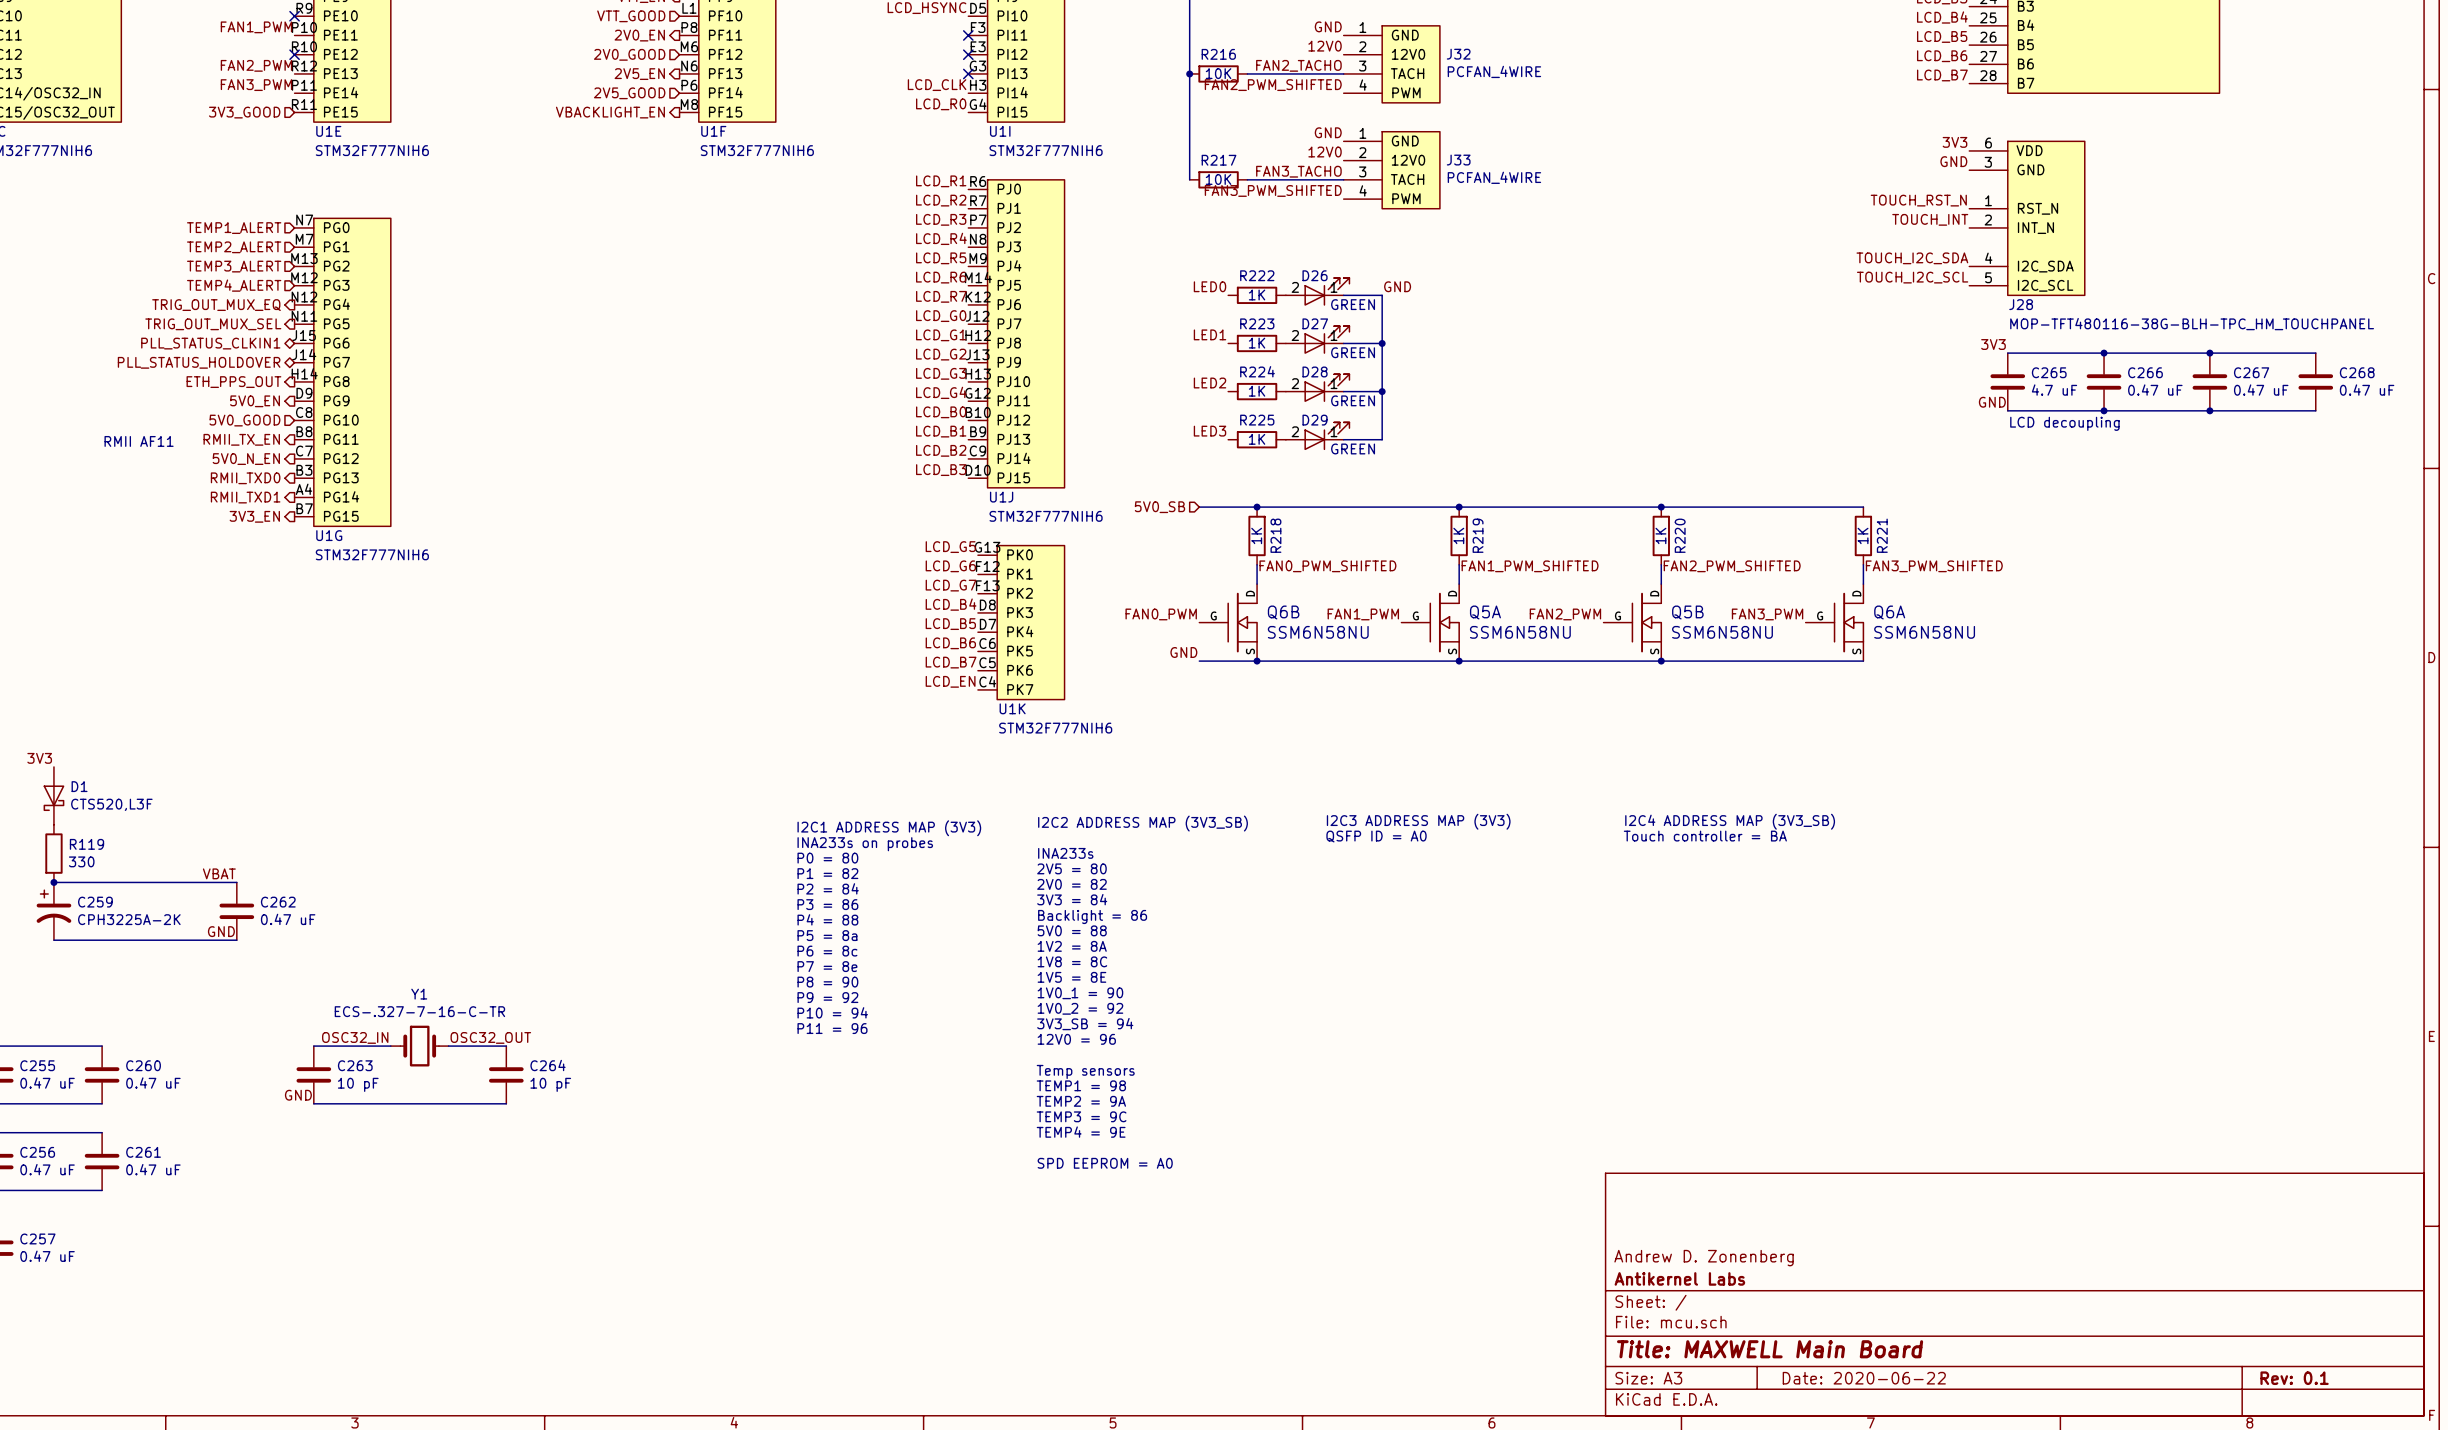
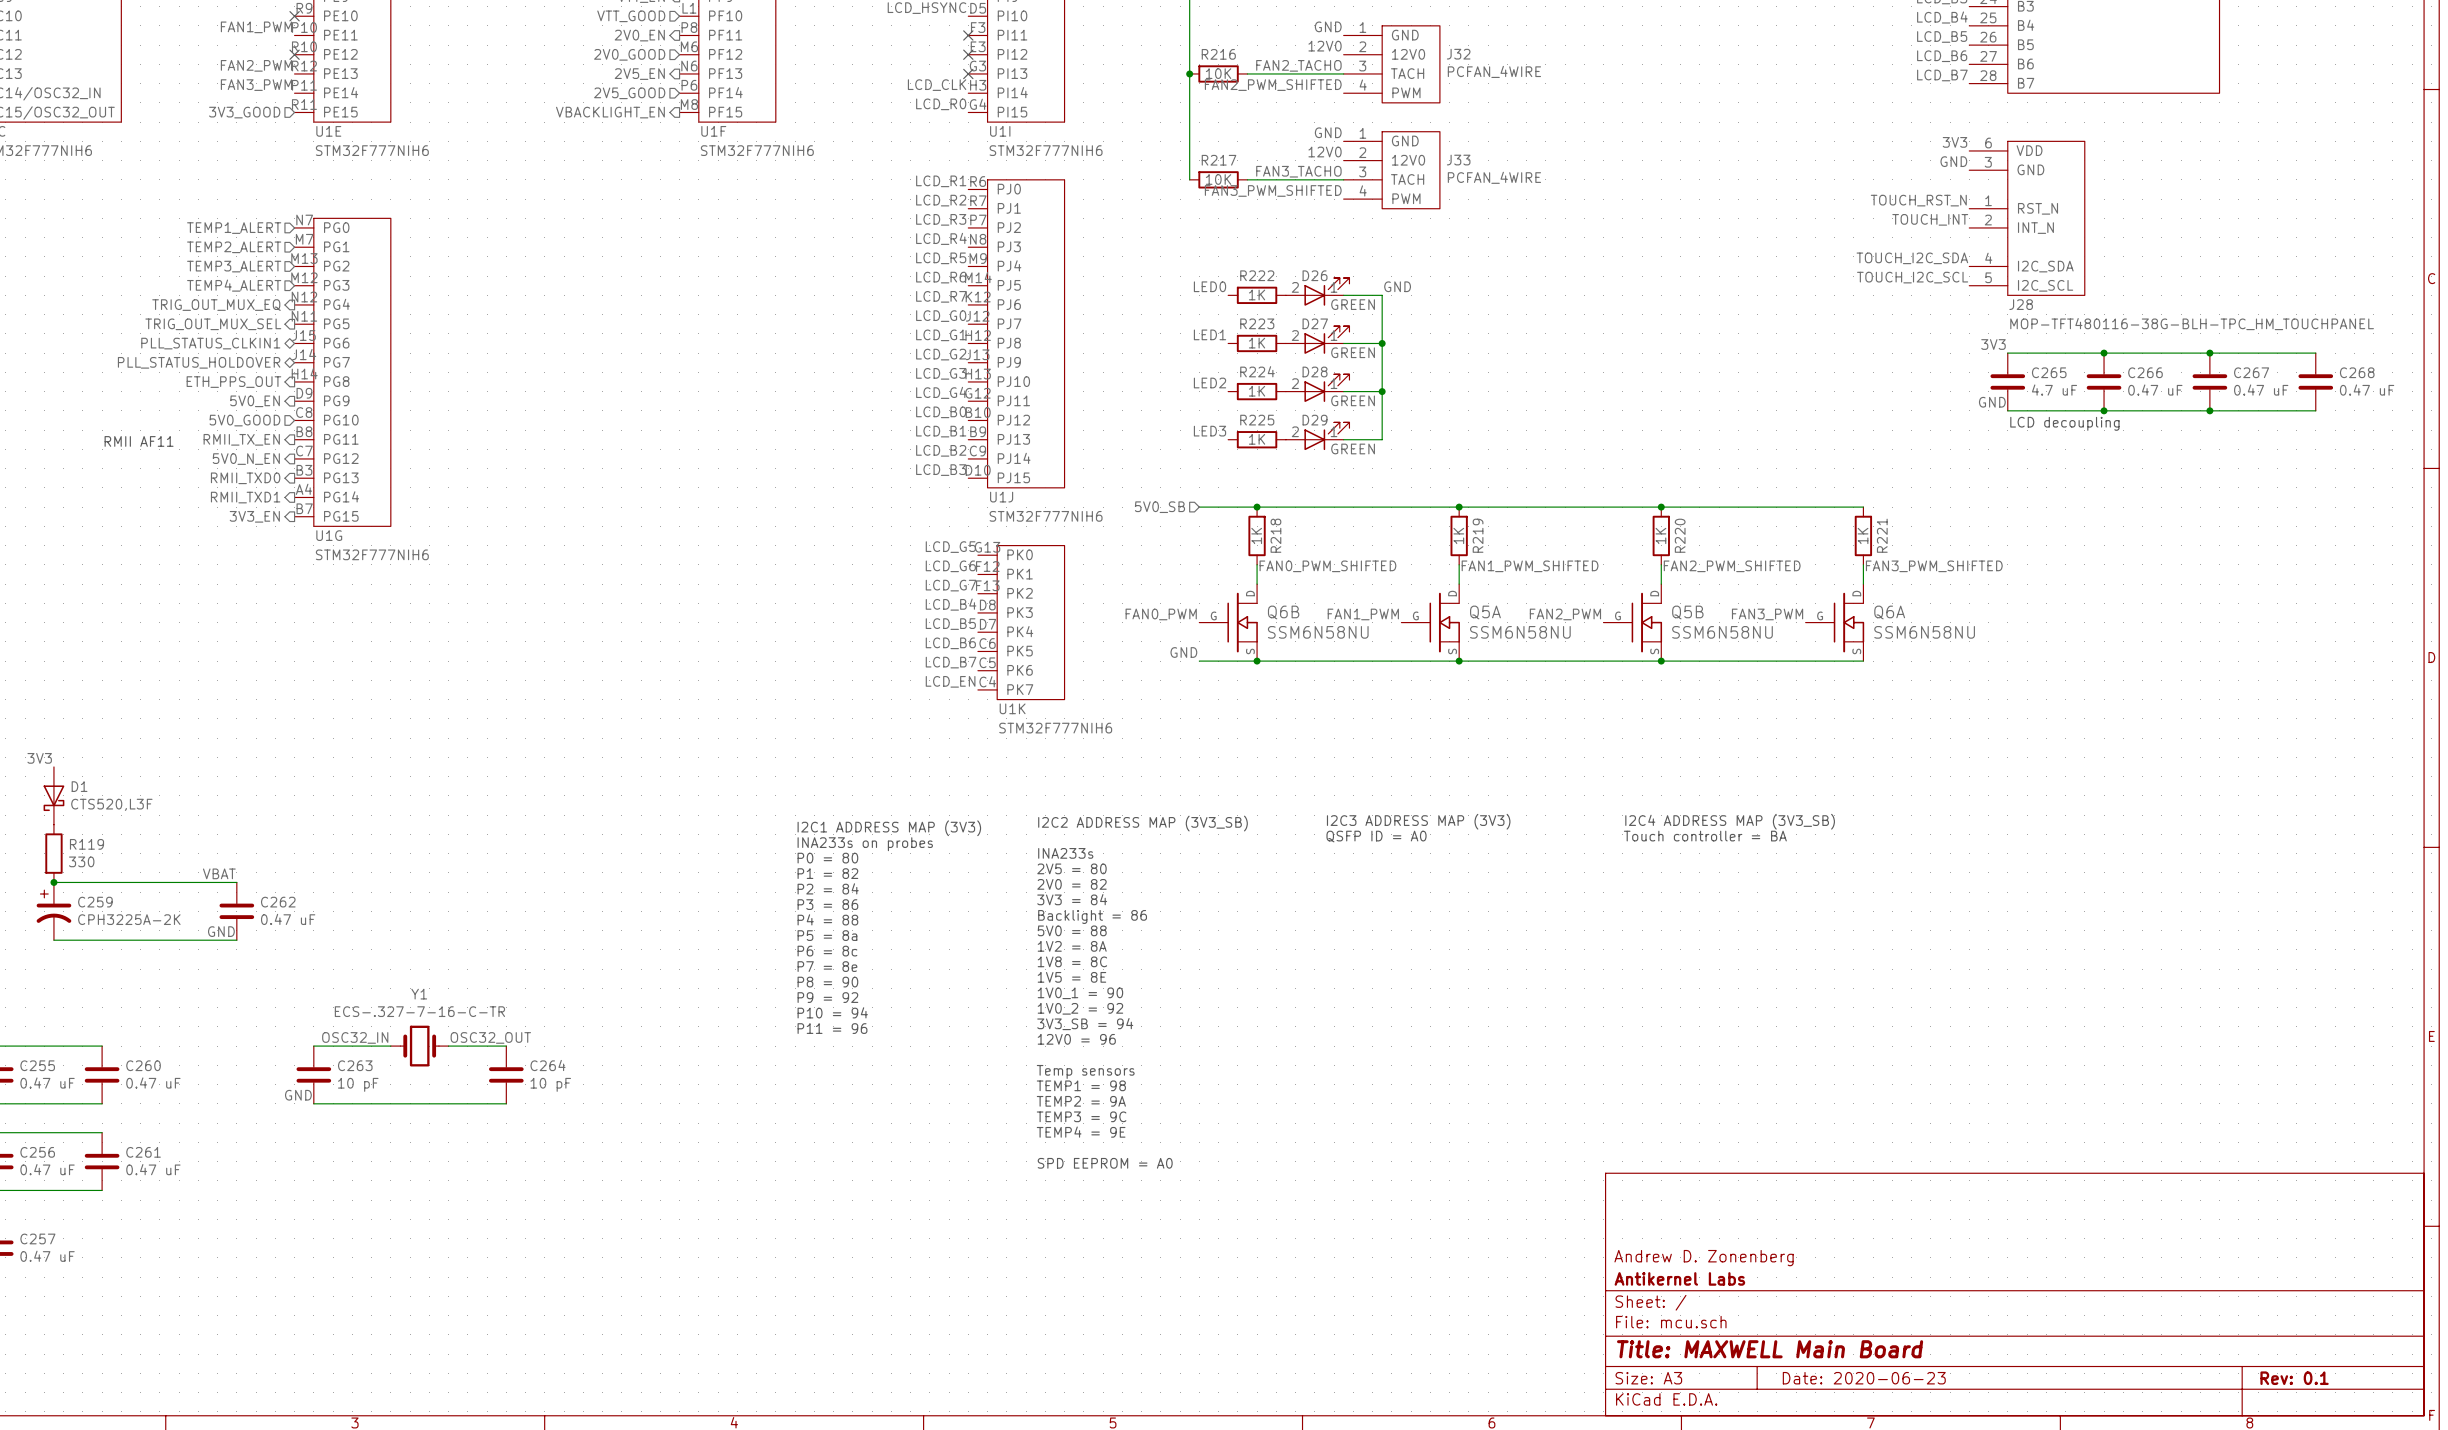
title block: Date: 2020-06-22 (1864, 1378) -> Date: 2020-06-23 (1864, 1378)

